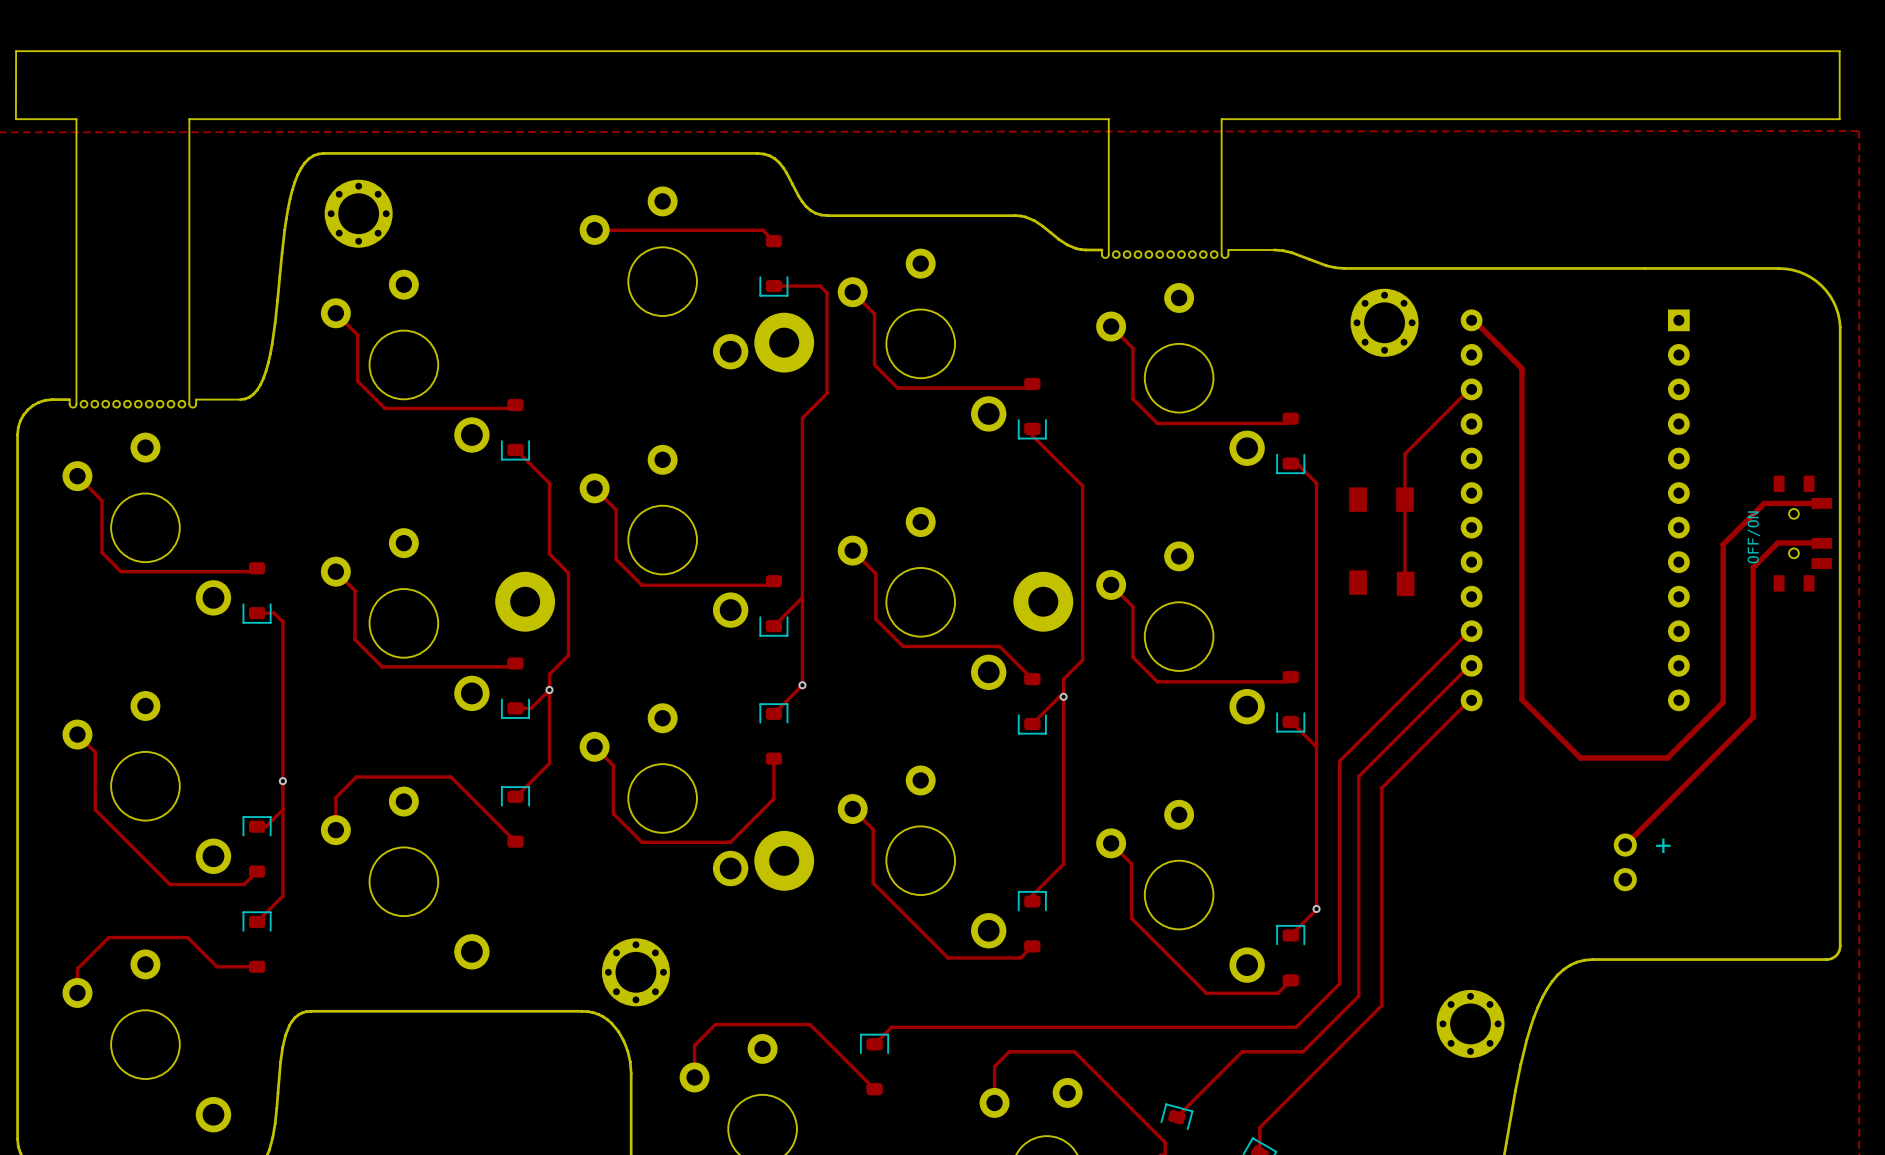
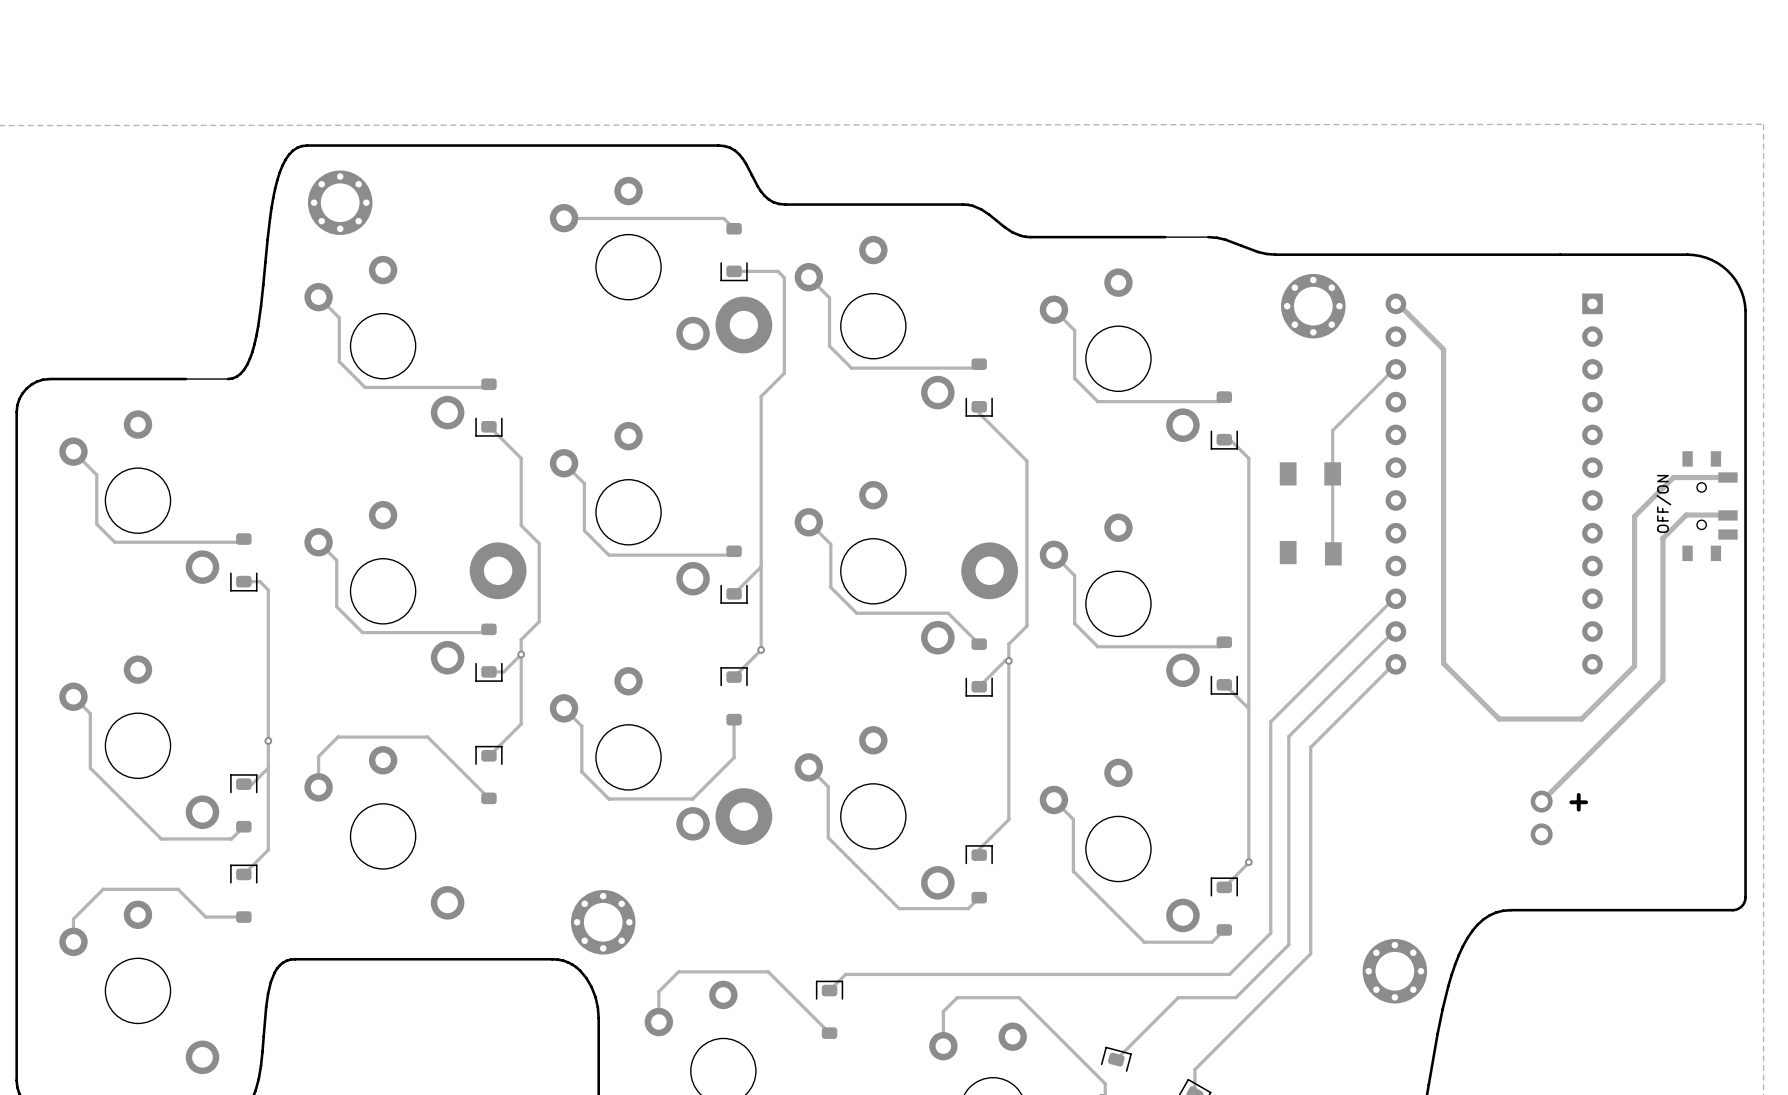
board edge: (1101, 249) (1102, 256) (1107, 257) (1108, 119) (189, 119) (190, 406) (195, 406) (196, 399) -> (1045, 237) (1165, 237)
board edge: (1228, 249) (1227, 256) (1222, 257) (1221, 119) (1839, 119) (1839, 51) (16, 51) (15, 119) (76, 119) (75, 406) (70, 406) (69, 399) -> (186, 379) (66, 379)
round board edge: [1112, 250, 1120, 259] -> none
round board edge: [1123, 250, 1131, 259] -> none
round board edge: [1134, 250, 1142, 259] -> none
round board edge: [1145, 250, 1153, 259] -> none
round board edge: [1156, 250, 1164, 259] -> none
round board edge: [1166, 250, 1175, 259] -> none
round board edge: [1177, 250, 1186, 259] -> none
round board edge: [1188, 250, 1197, 259] -> none
round board edge: [1199, 250, 1208, 259] -> none
round board edge: [1210, 250, 1218, 259] -> none
round board edge: [80, 400, 88, 408] -> none
round board edge: [91, 400, 99, 408] -> none
round board edge: [101, 400, 110, 408] -> none
round board edge: [112, 400, 121, 408] -> none
round board edge: [123, 400, 132, 408] -> none
round board edge: [134, 400, 143, 408] -> none
round board edge: [145, 400, 153, 408] -> none
round board edge: [156, 400, 164, 408] -> none
round board edge: [167, 400, 175, 408] -> none
round board edge: [178, 400, 186, 408] -> none

